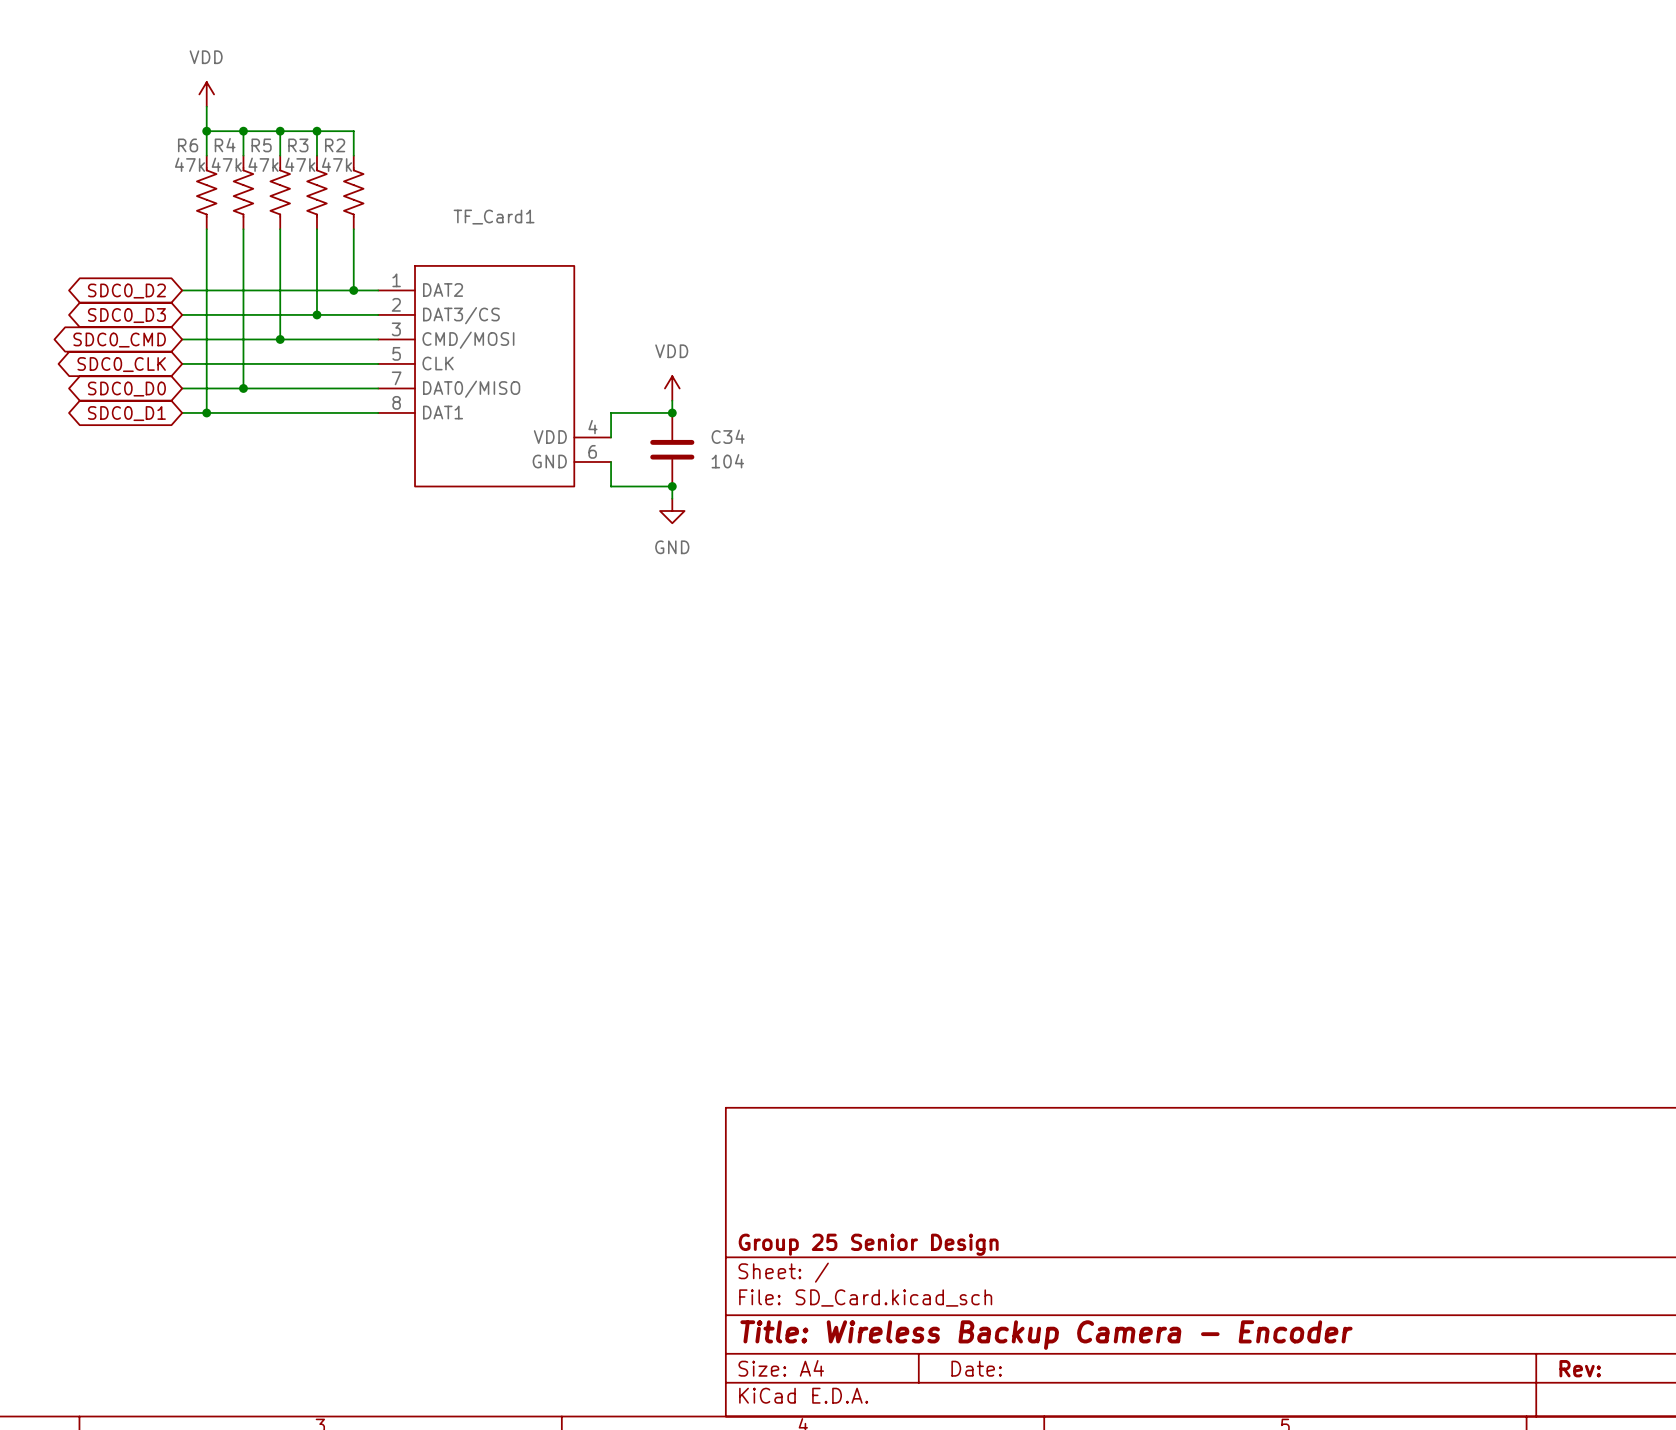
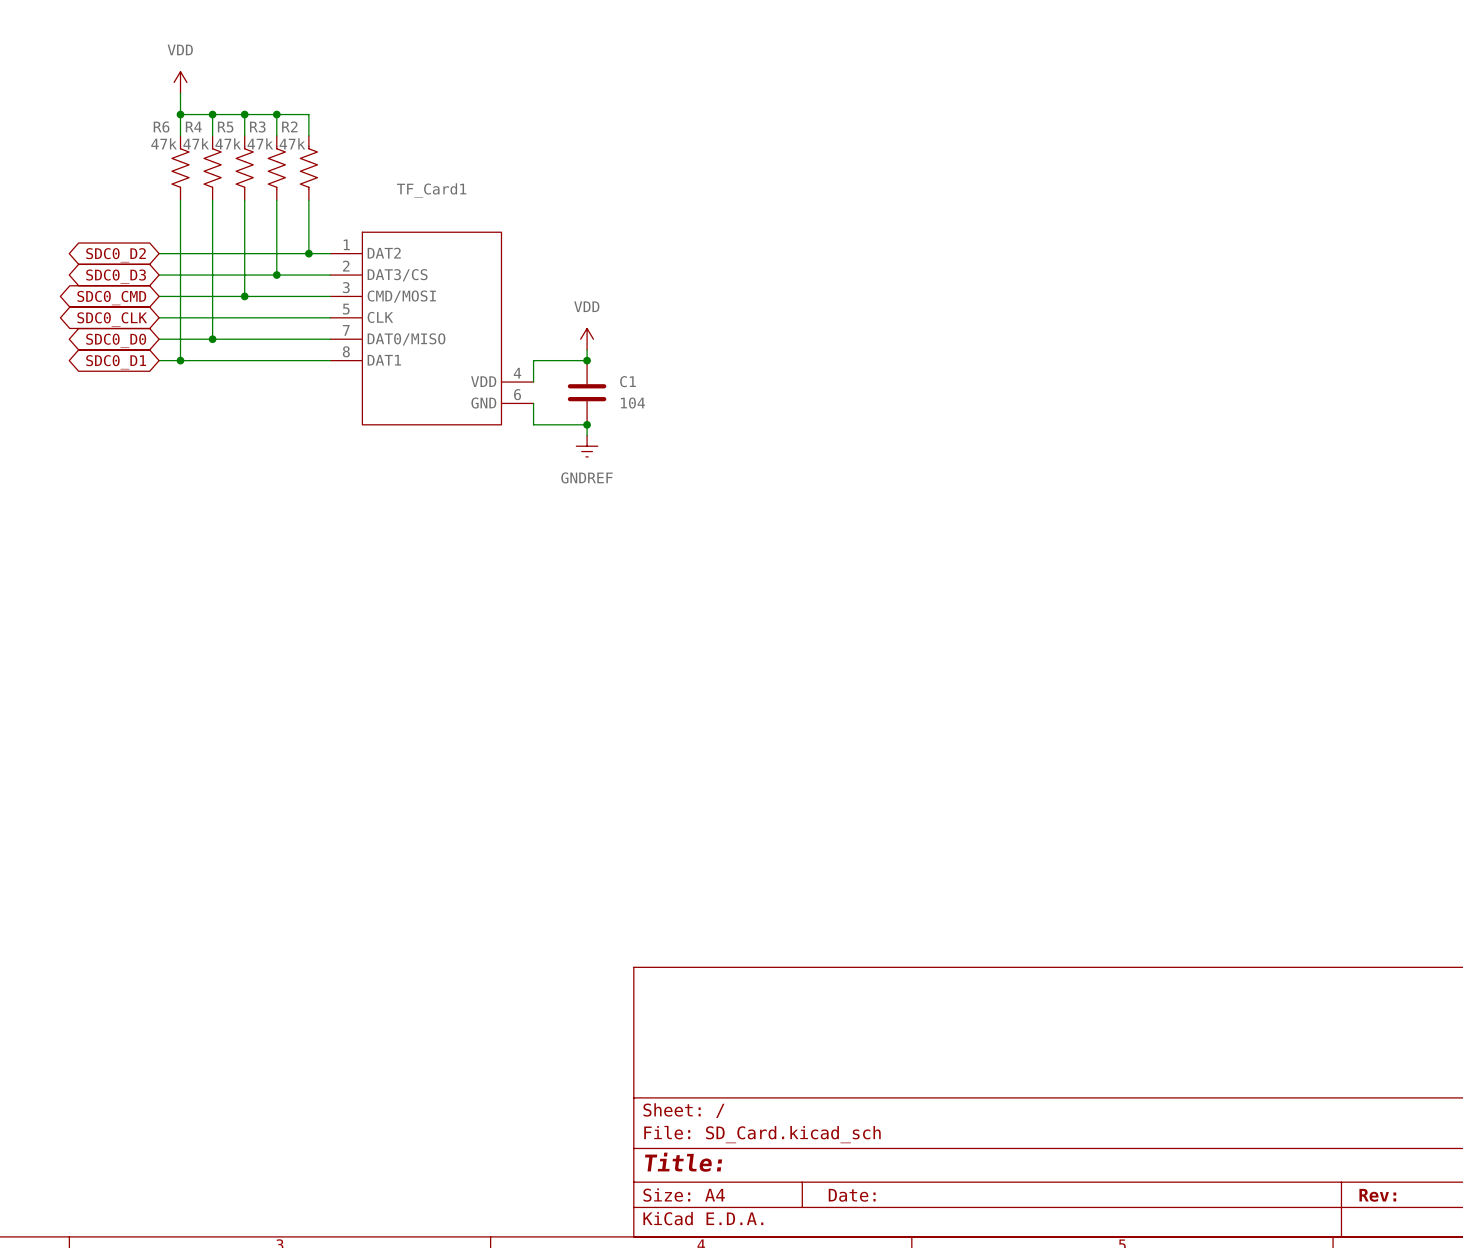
C34 name: C34 (728, 436) -> C1 (627, 381)
power symbol: GND (672, 511) -> GNDREF (587, 446)
title block: Group 25 Senior Design (868, 1244) -> none
title block: Title: Wireless Backup Camera - Encoder (1046, 1335) -> Title: (683, 1162)

